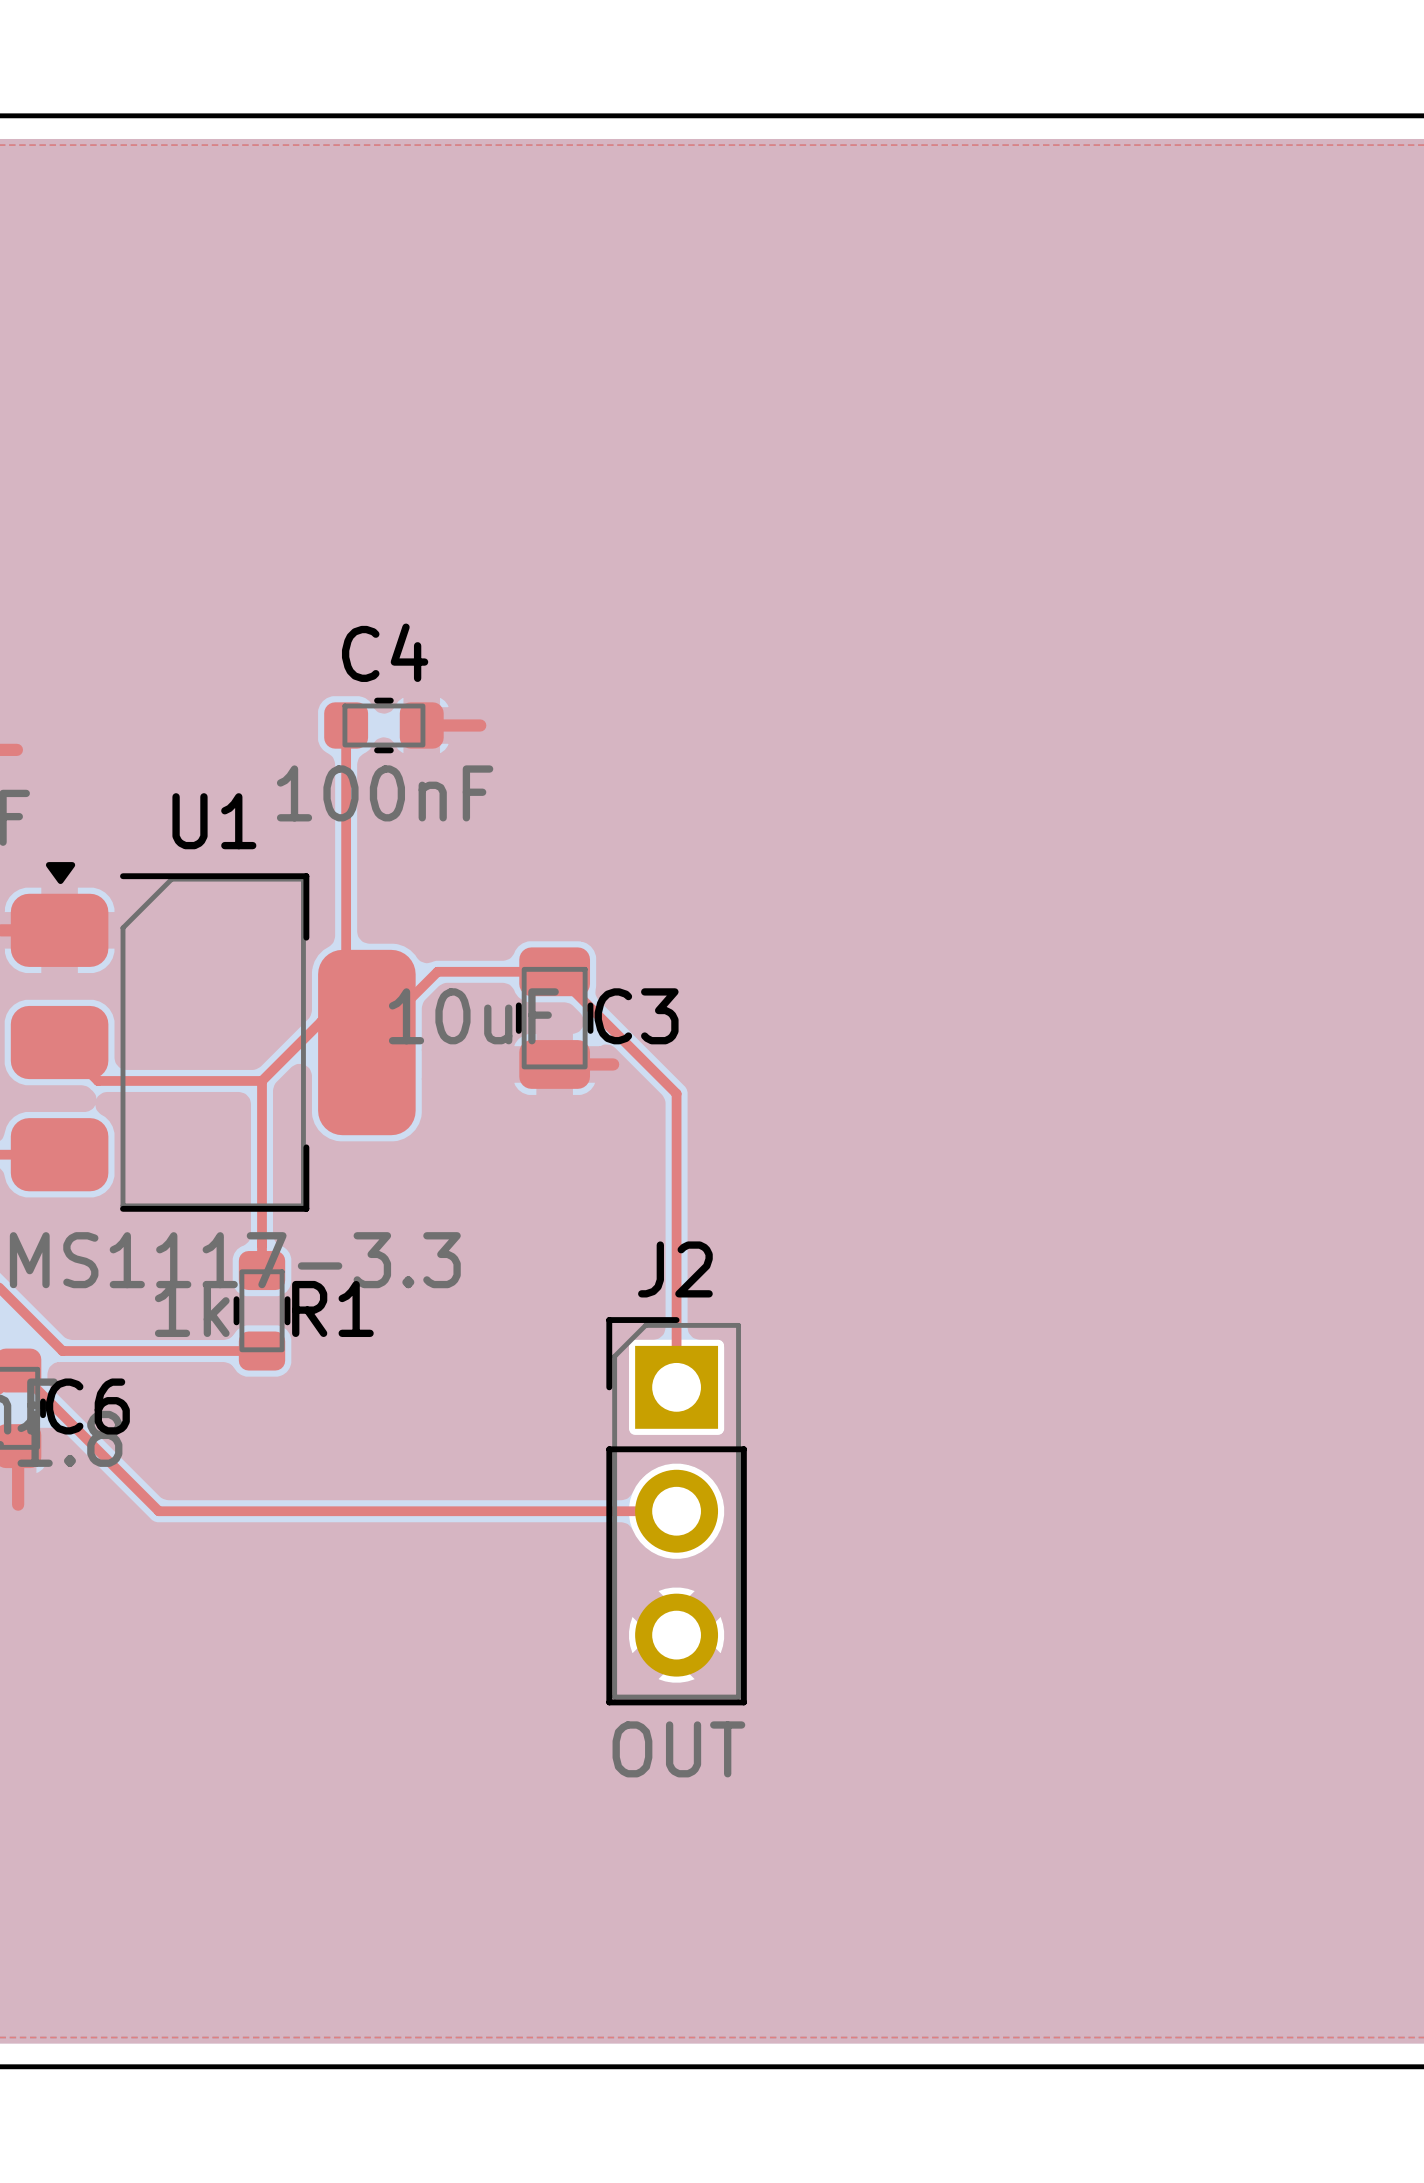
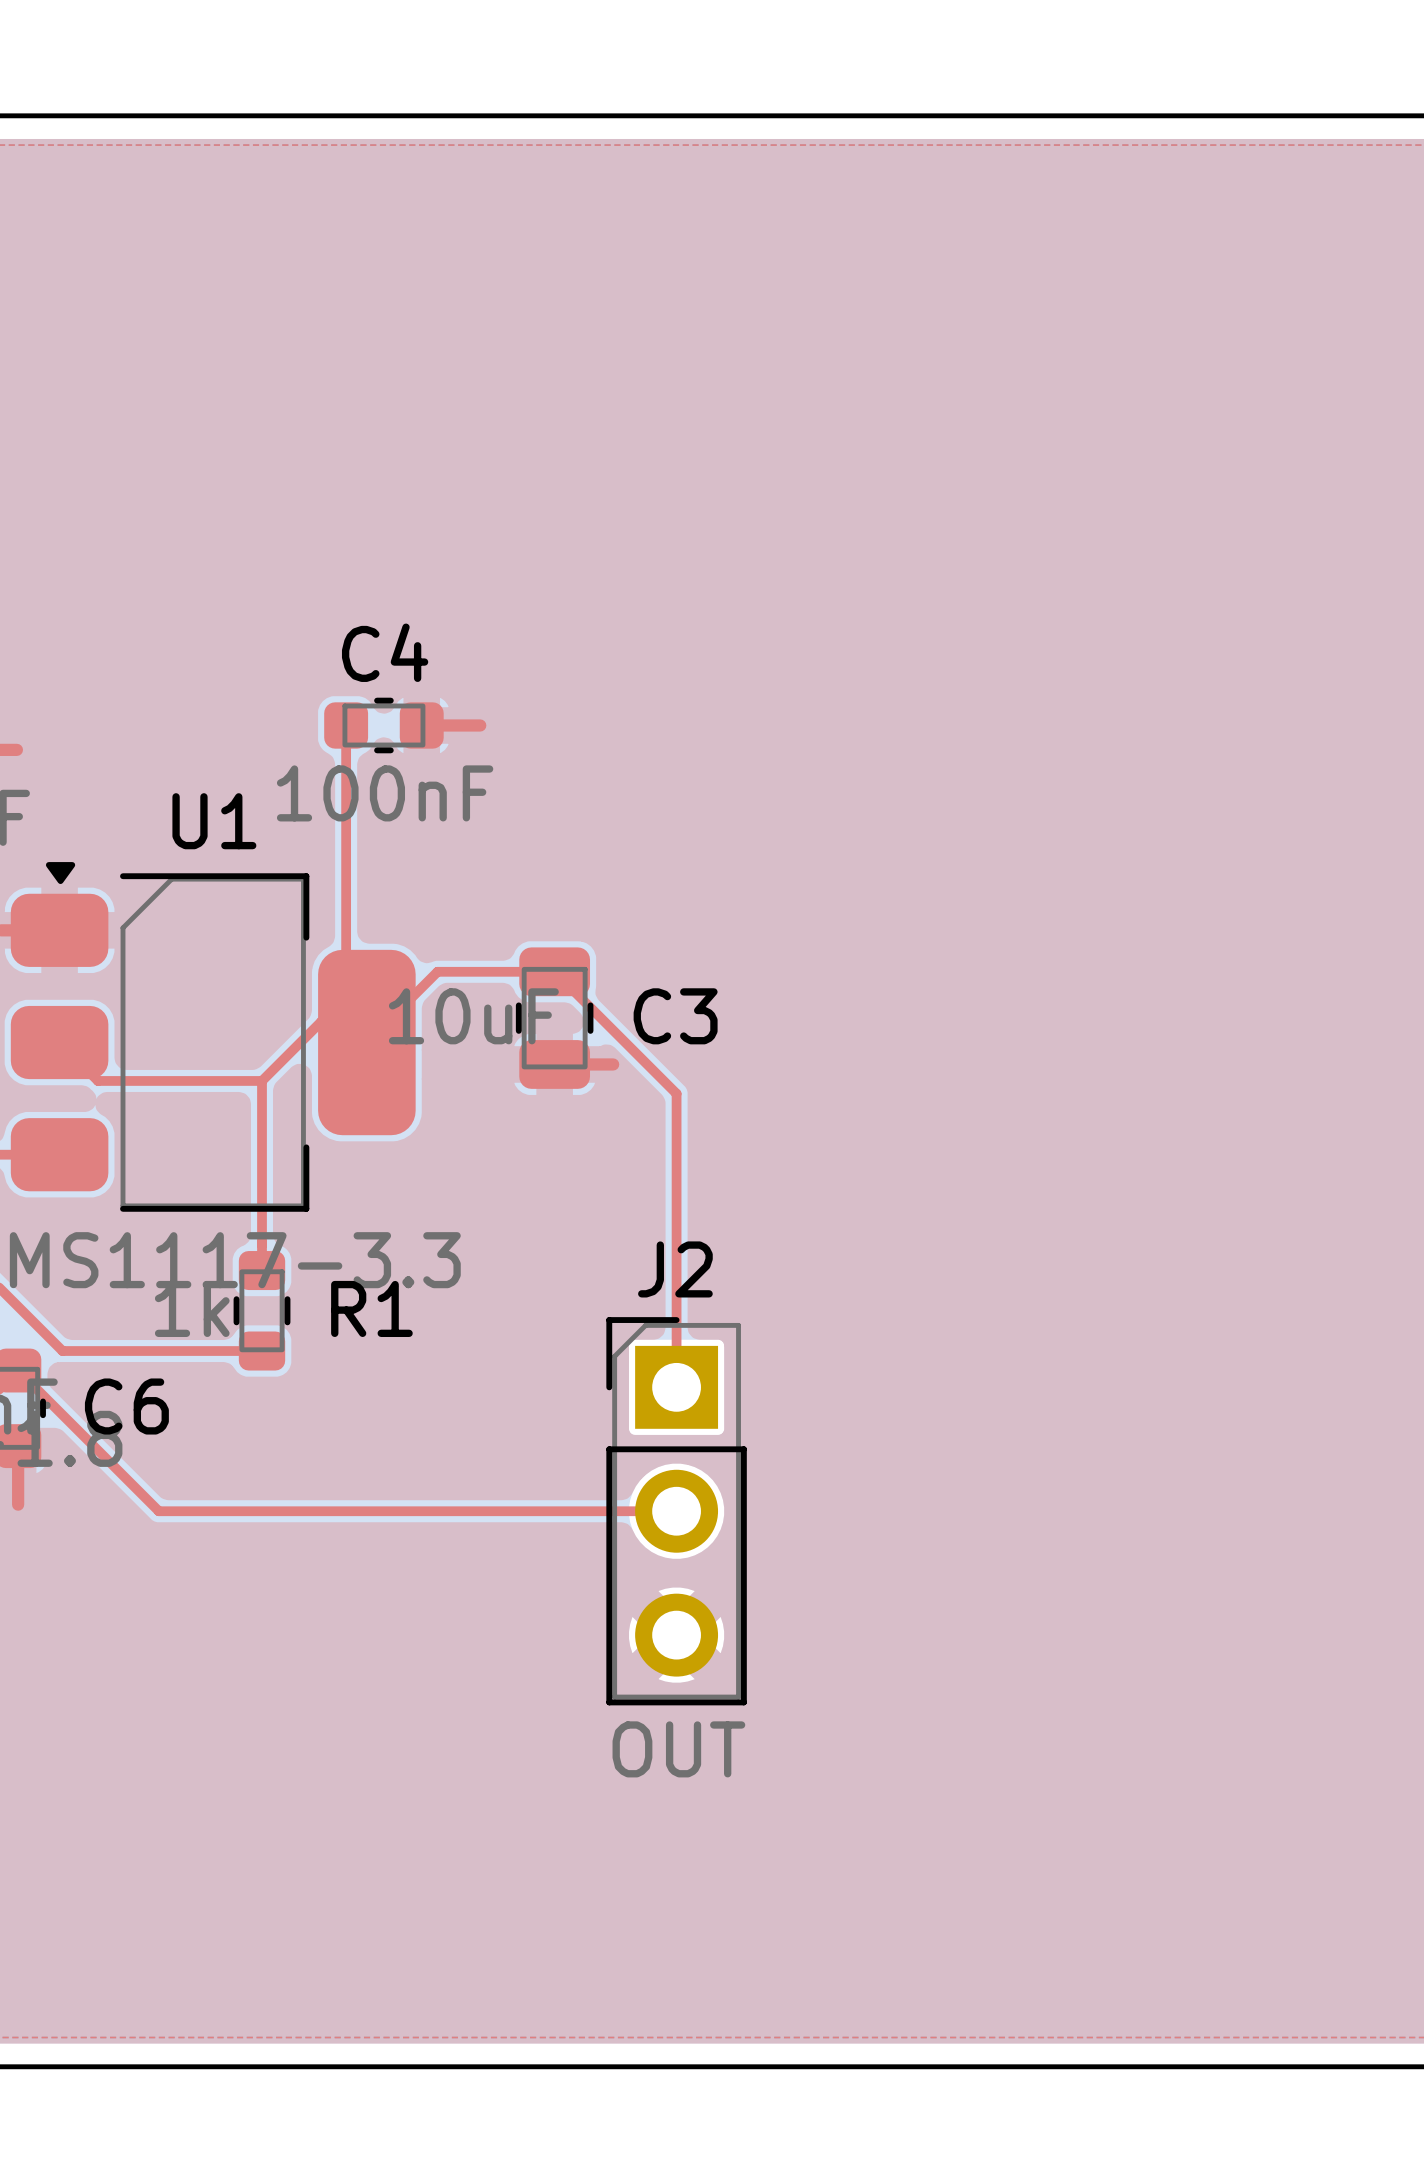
C3 name position: C3 (636, 1016) -> C3 (675, 1016)
R1 name position: R1 (332, 1308) -> R1 (371, 1308)
C6 name position: C6 (87, 1406) -> C6 (126, 1406)

